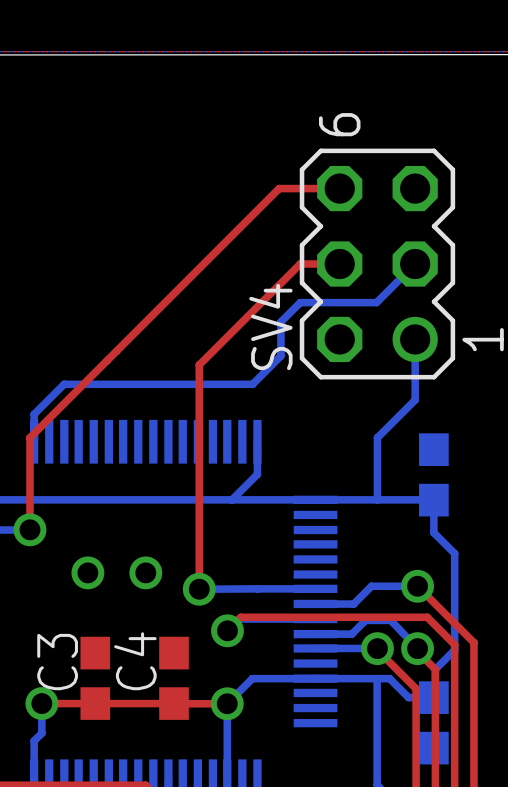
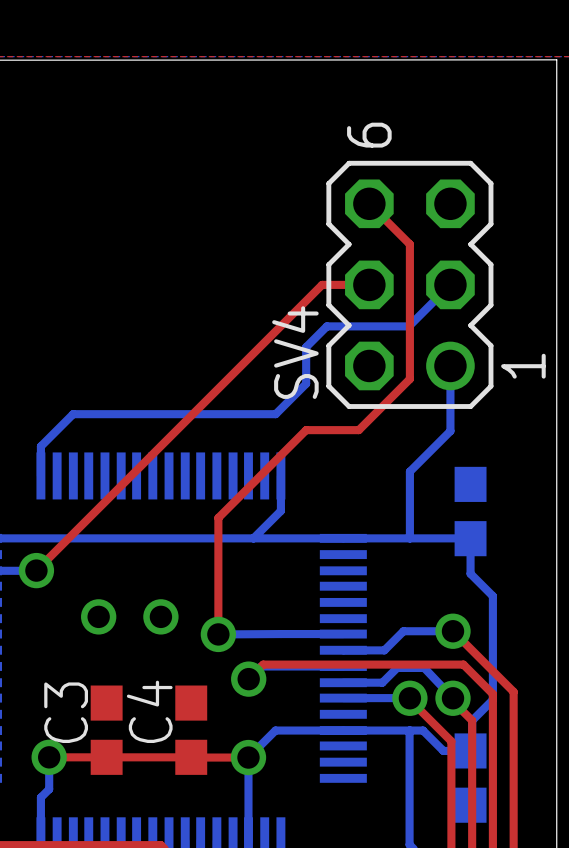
top track: (339, 188) (279, 188) (29, 437) (29, 529) -> (326, 284) (322, 284) (36, 570)
top track: (300, 264) (199, 364) (199, 480) -> (369, 203) (409, 244) (409, 379) (358, 430) (306, 430) (218, 517)

